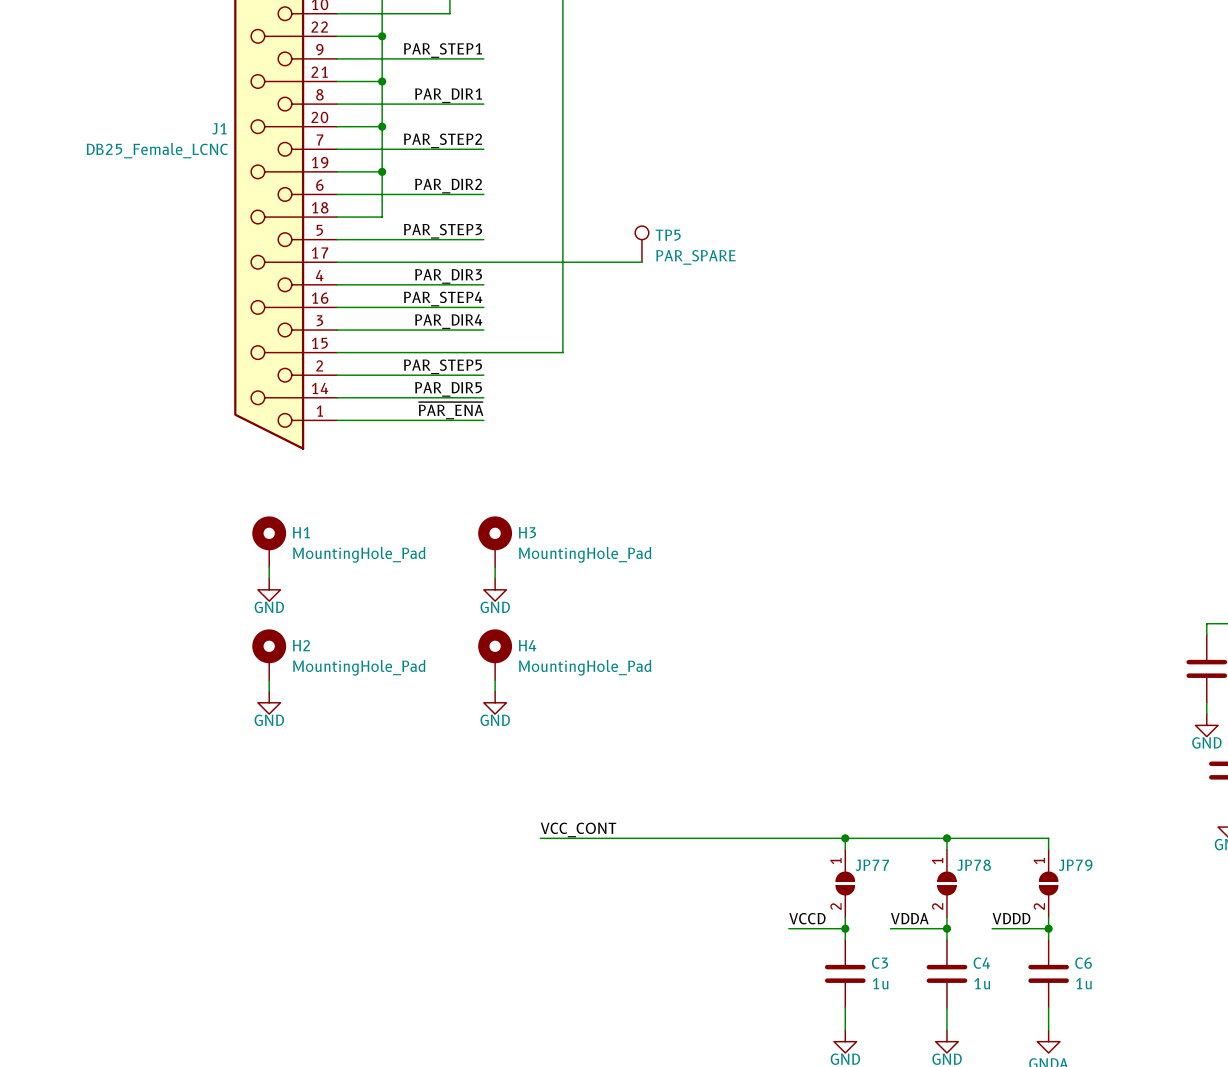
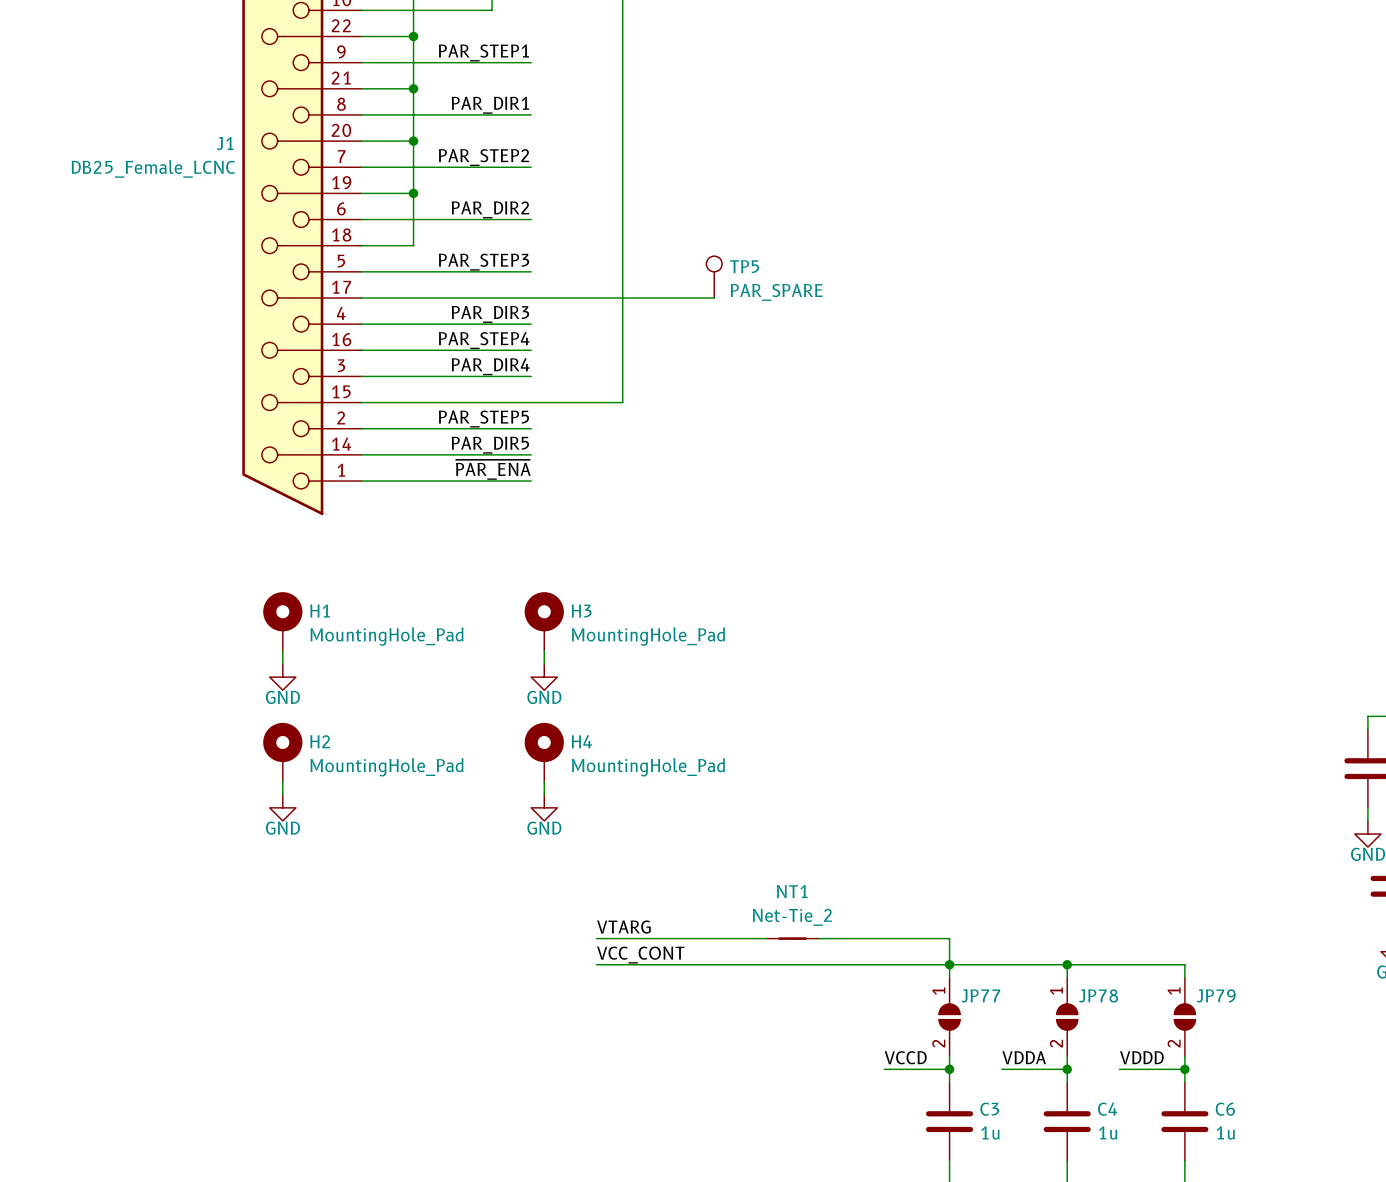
label: none -> VTARG (623, 927)
wire: none -> (596, 938) (766, 938)
NT1: none -> Net-Tie_2 (792, 938)
wire: none -> (818, 938) (949, 938) (949, 964)

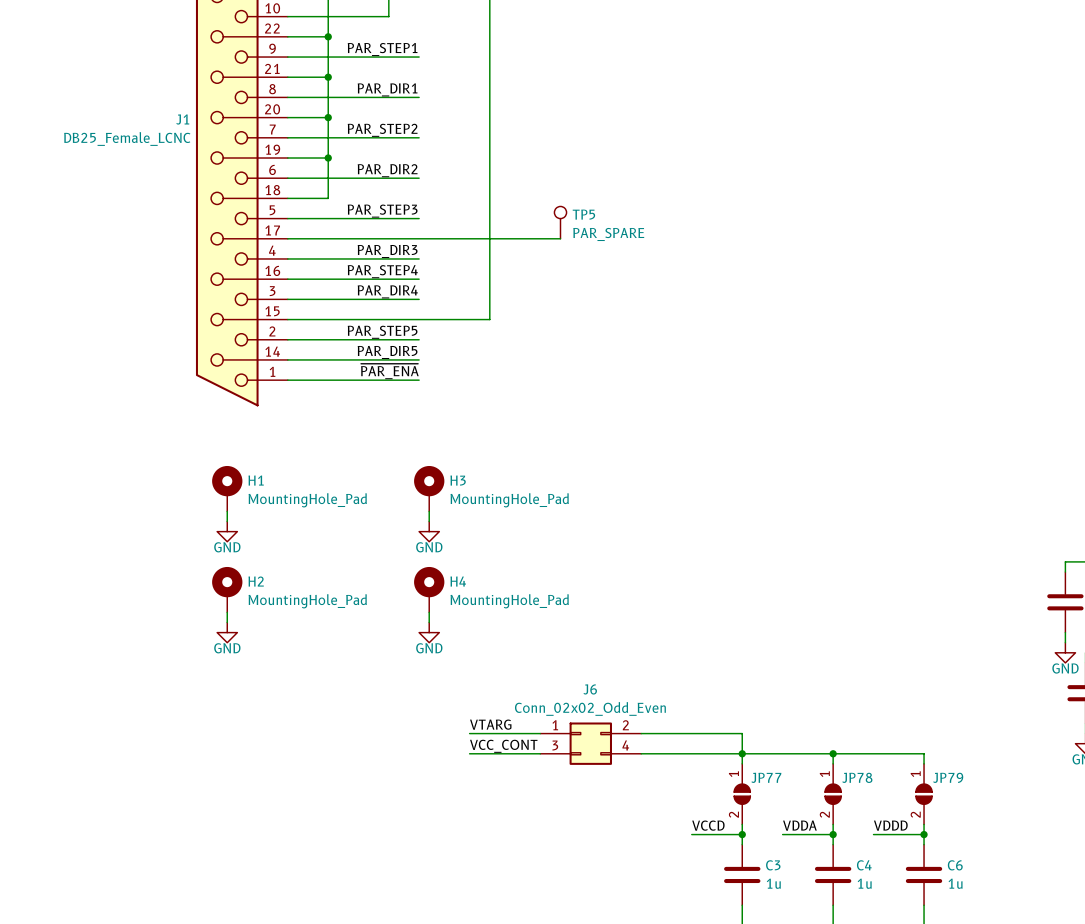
NT1: Net-Tie_2 (792, 938) -> none
J6: none -> Conn_02x02_Odd_Even (590, 743)

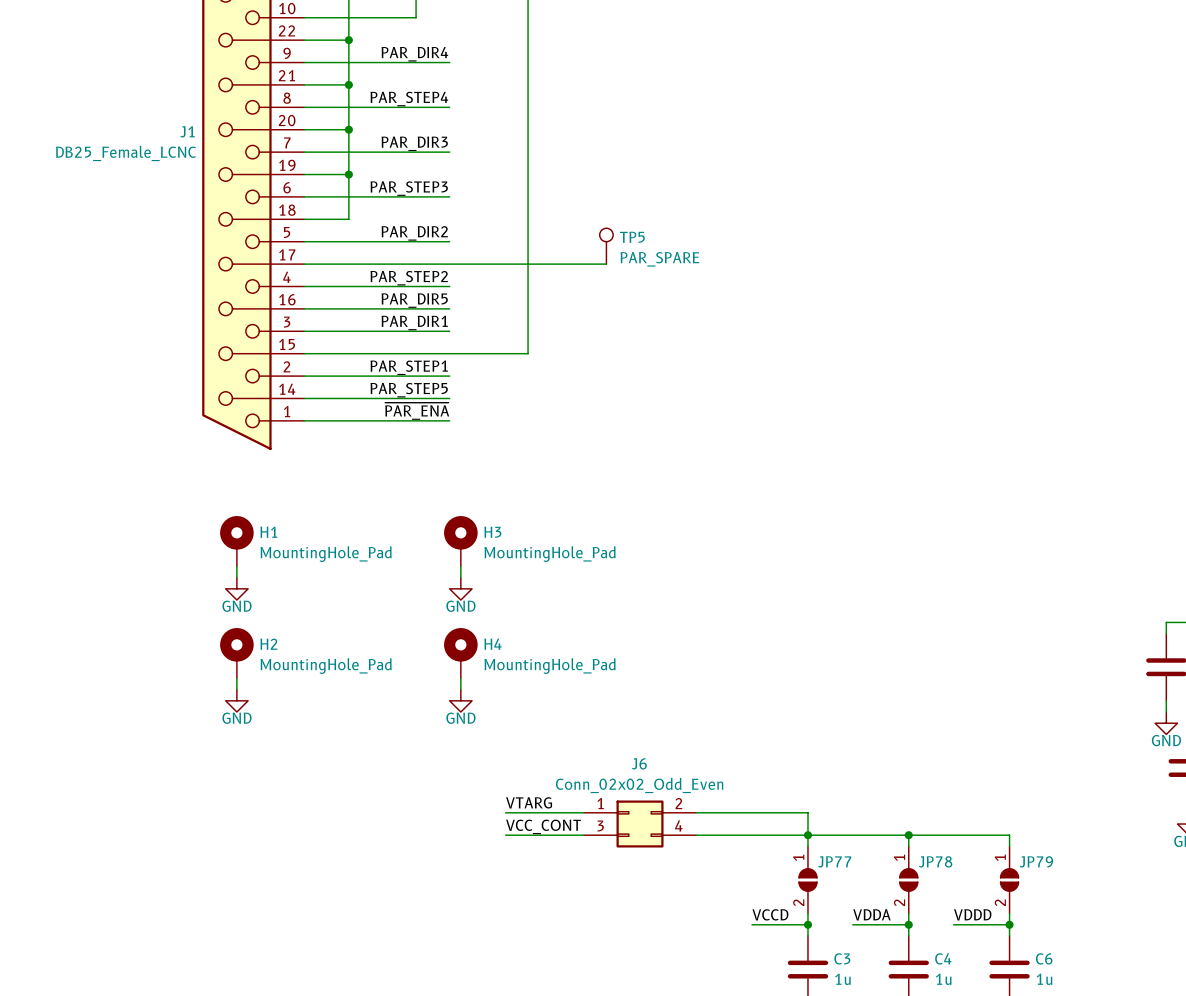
label: PAR_STEP1 (382, 49) -> PAR_DIR4 (414, 54)
label: PAR_DIR1 (387, 89) -> PAR_STEP4 (409, 99)
label: PAR_STEP2 (382, 130) -> PAR_DIR3 (414, 143)
label: PAR_DIR2 (387, 170) -> PAR_STEP3 (409, 188)
label: PAR_STEP3 (382, 211) -> PAR_DIR2 (414, 233)
label: PAR_DIR3 (387, 251) -> PAR_STEP2 (409, 278)
label: PAR_STEP4 (382, 271) -> PAR_DIR5 (414, 300)
label: PAR_DIR4 (387, 291) -> PAR_DIR1 (414, 322)
label: PAR_STEP5 (382, 332) -> PAR_STEP1 (409, 367)
label: PAR_DIR5 (387, 352) -> PAR_STEP5 (409, 390)

